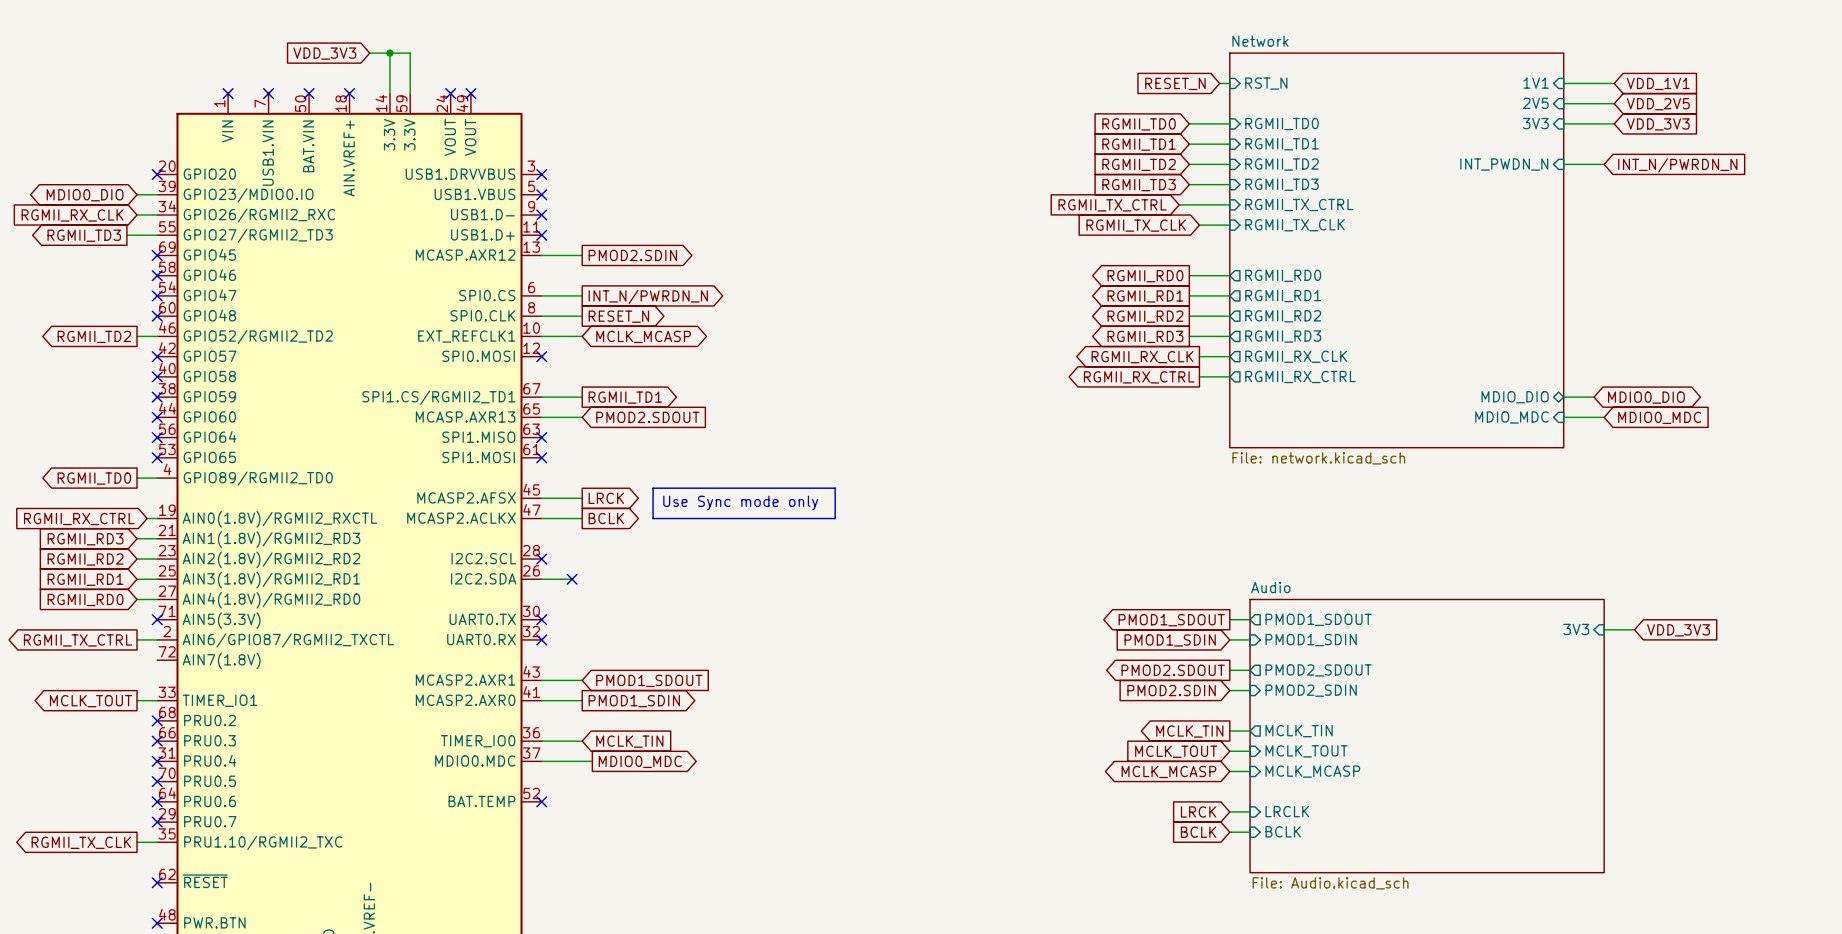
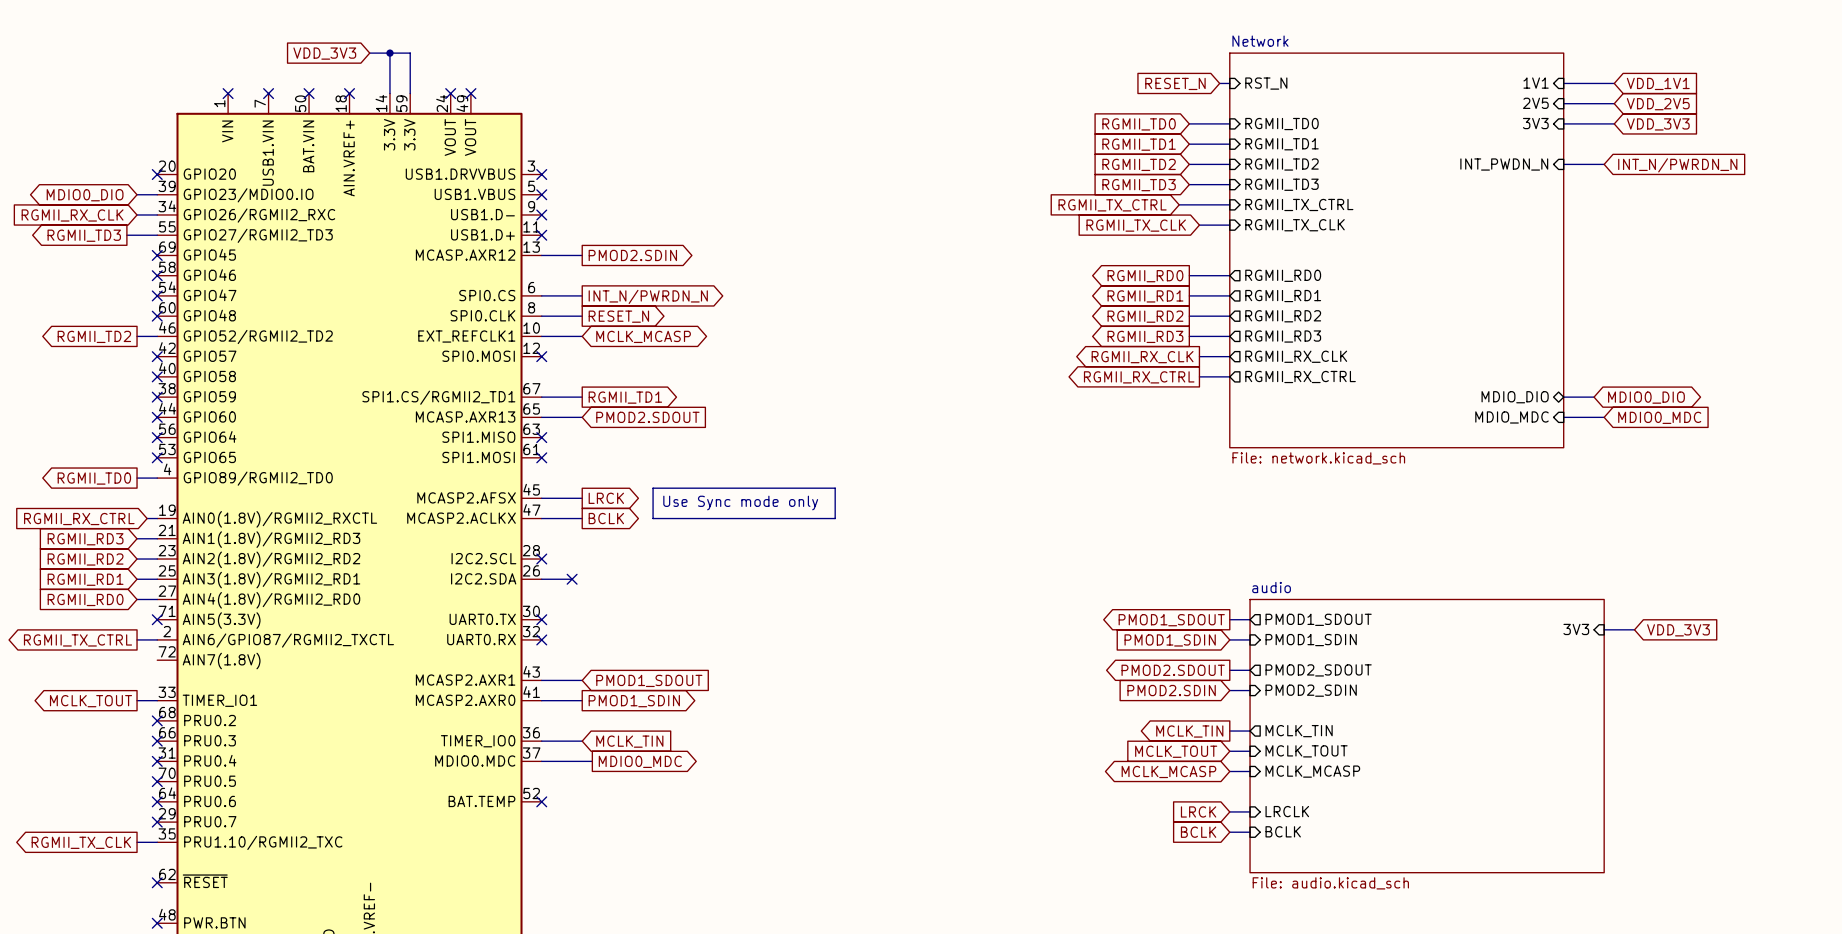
sheet Audio name: Audio (1270, 587) -> audio (1271, 587)
sheet Audio value: File: Audio.kicad_sch (1330, 883) -> File: audio.kicad_sch (1330, 883)

